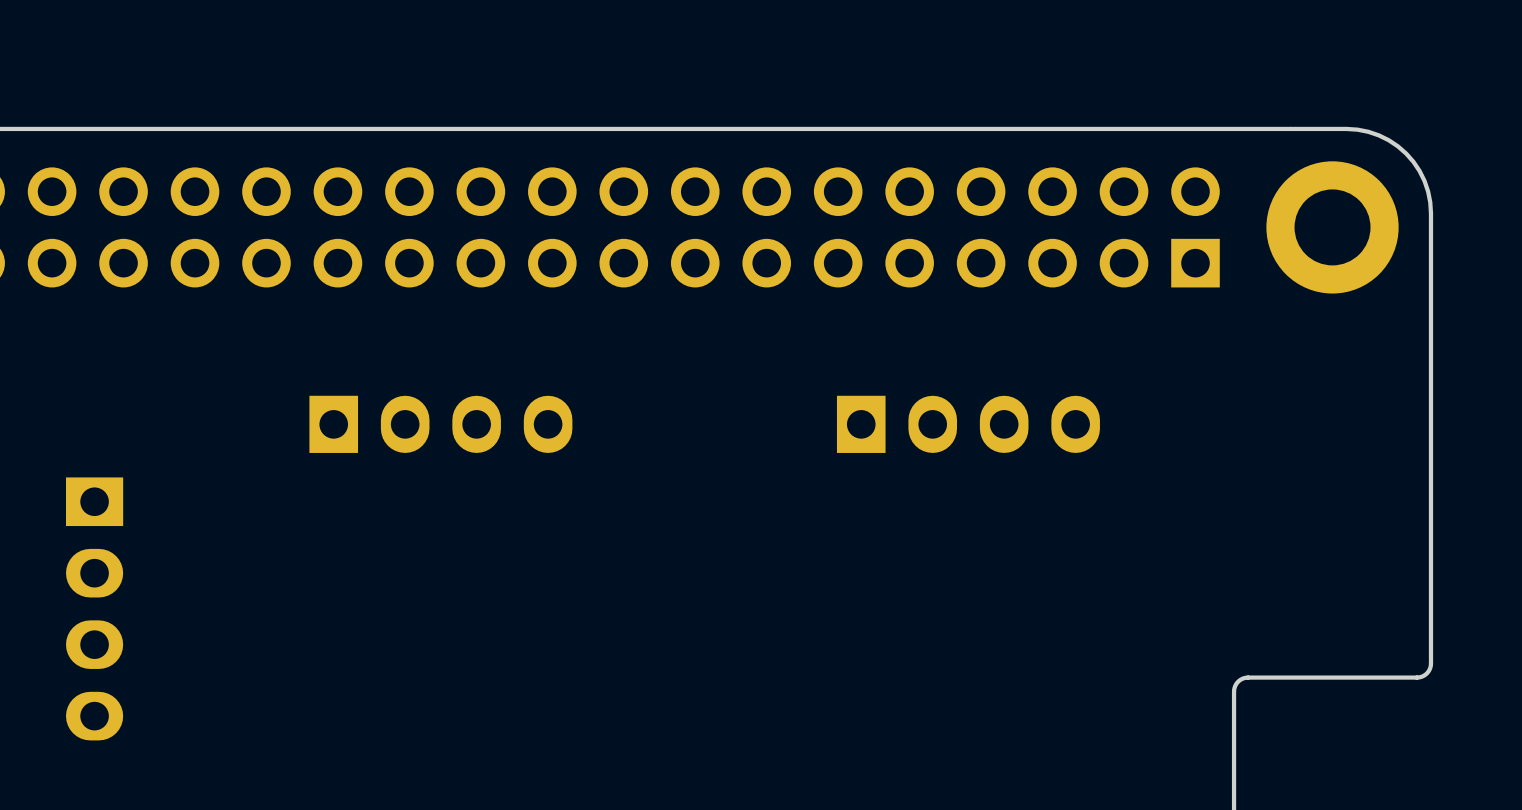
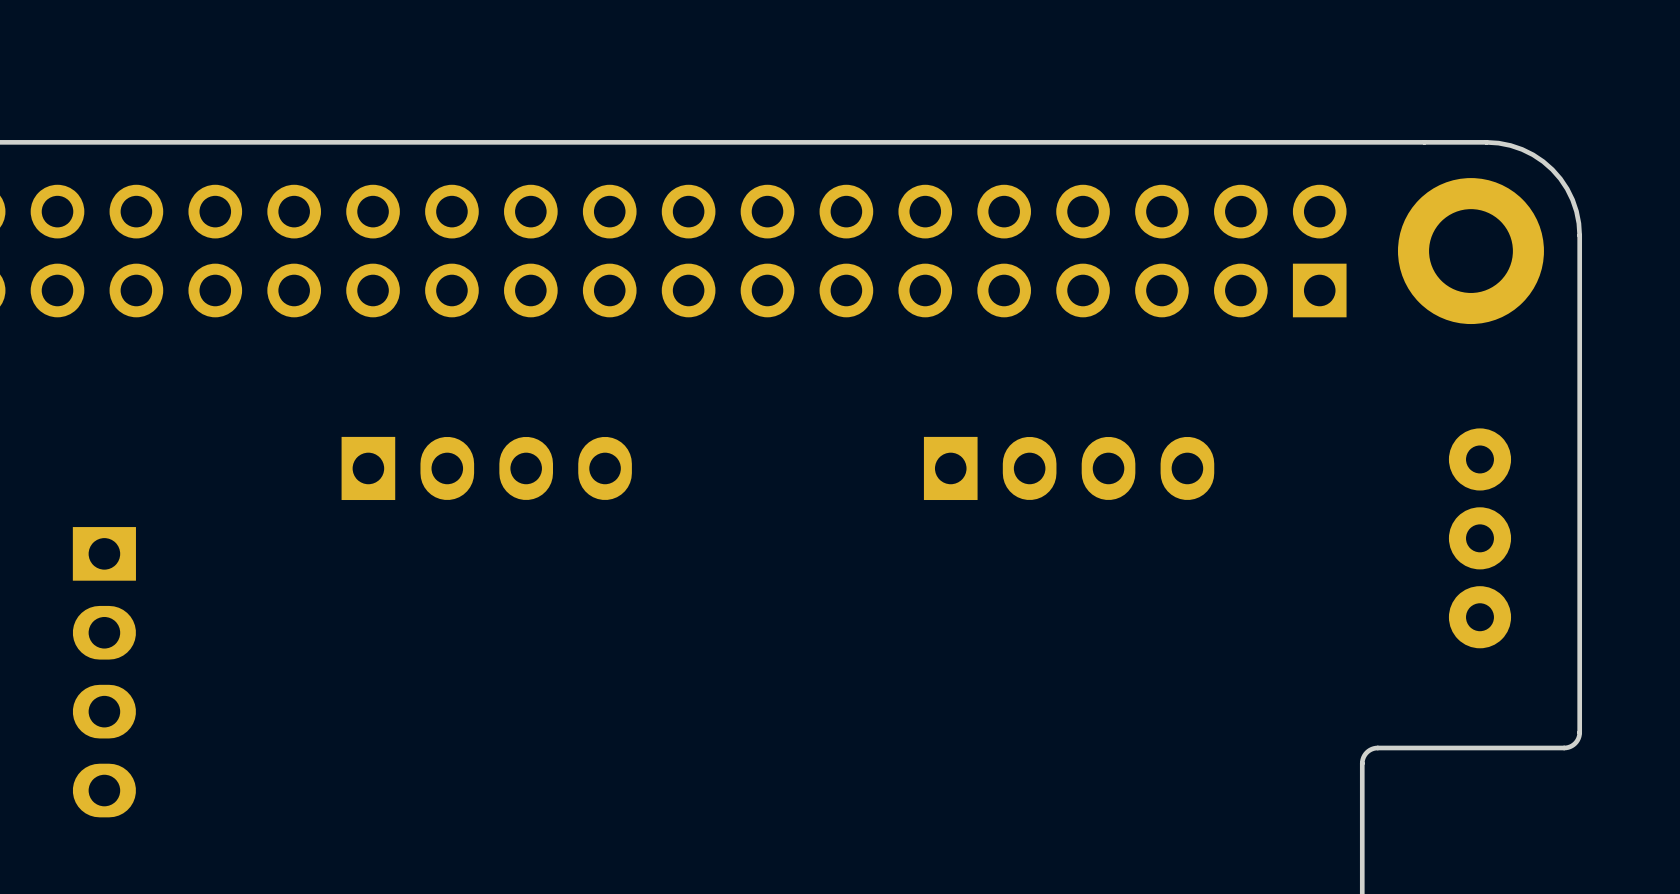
part: none -> (1479, 538)

